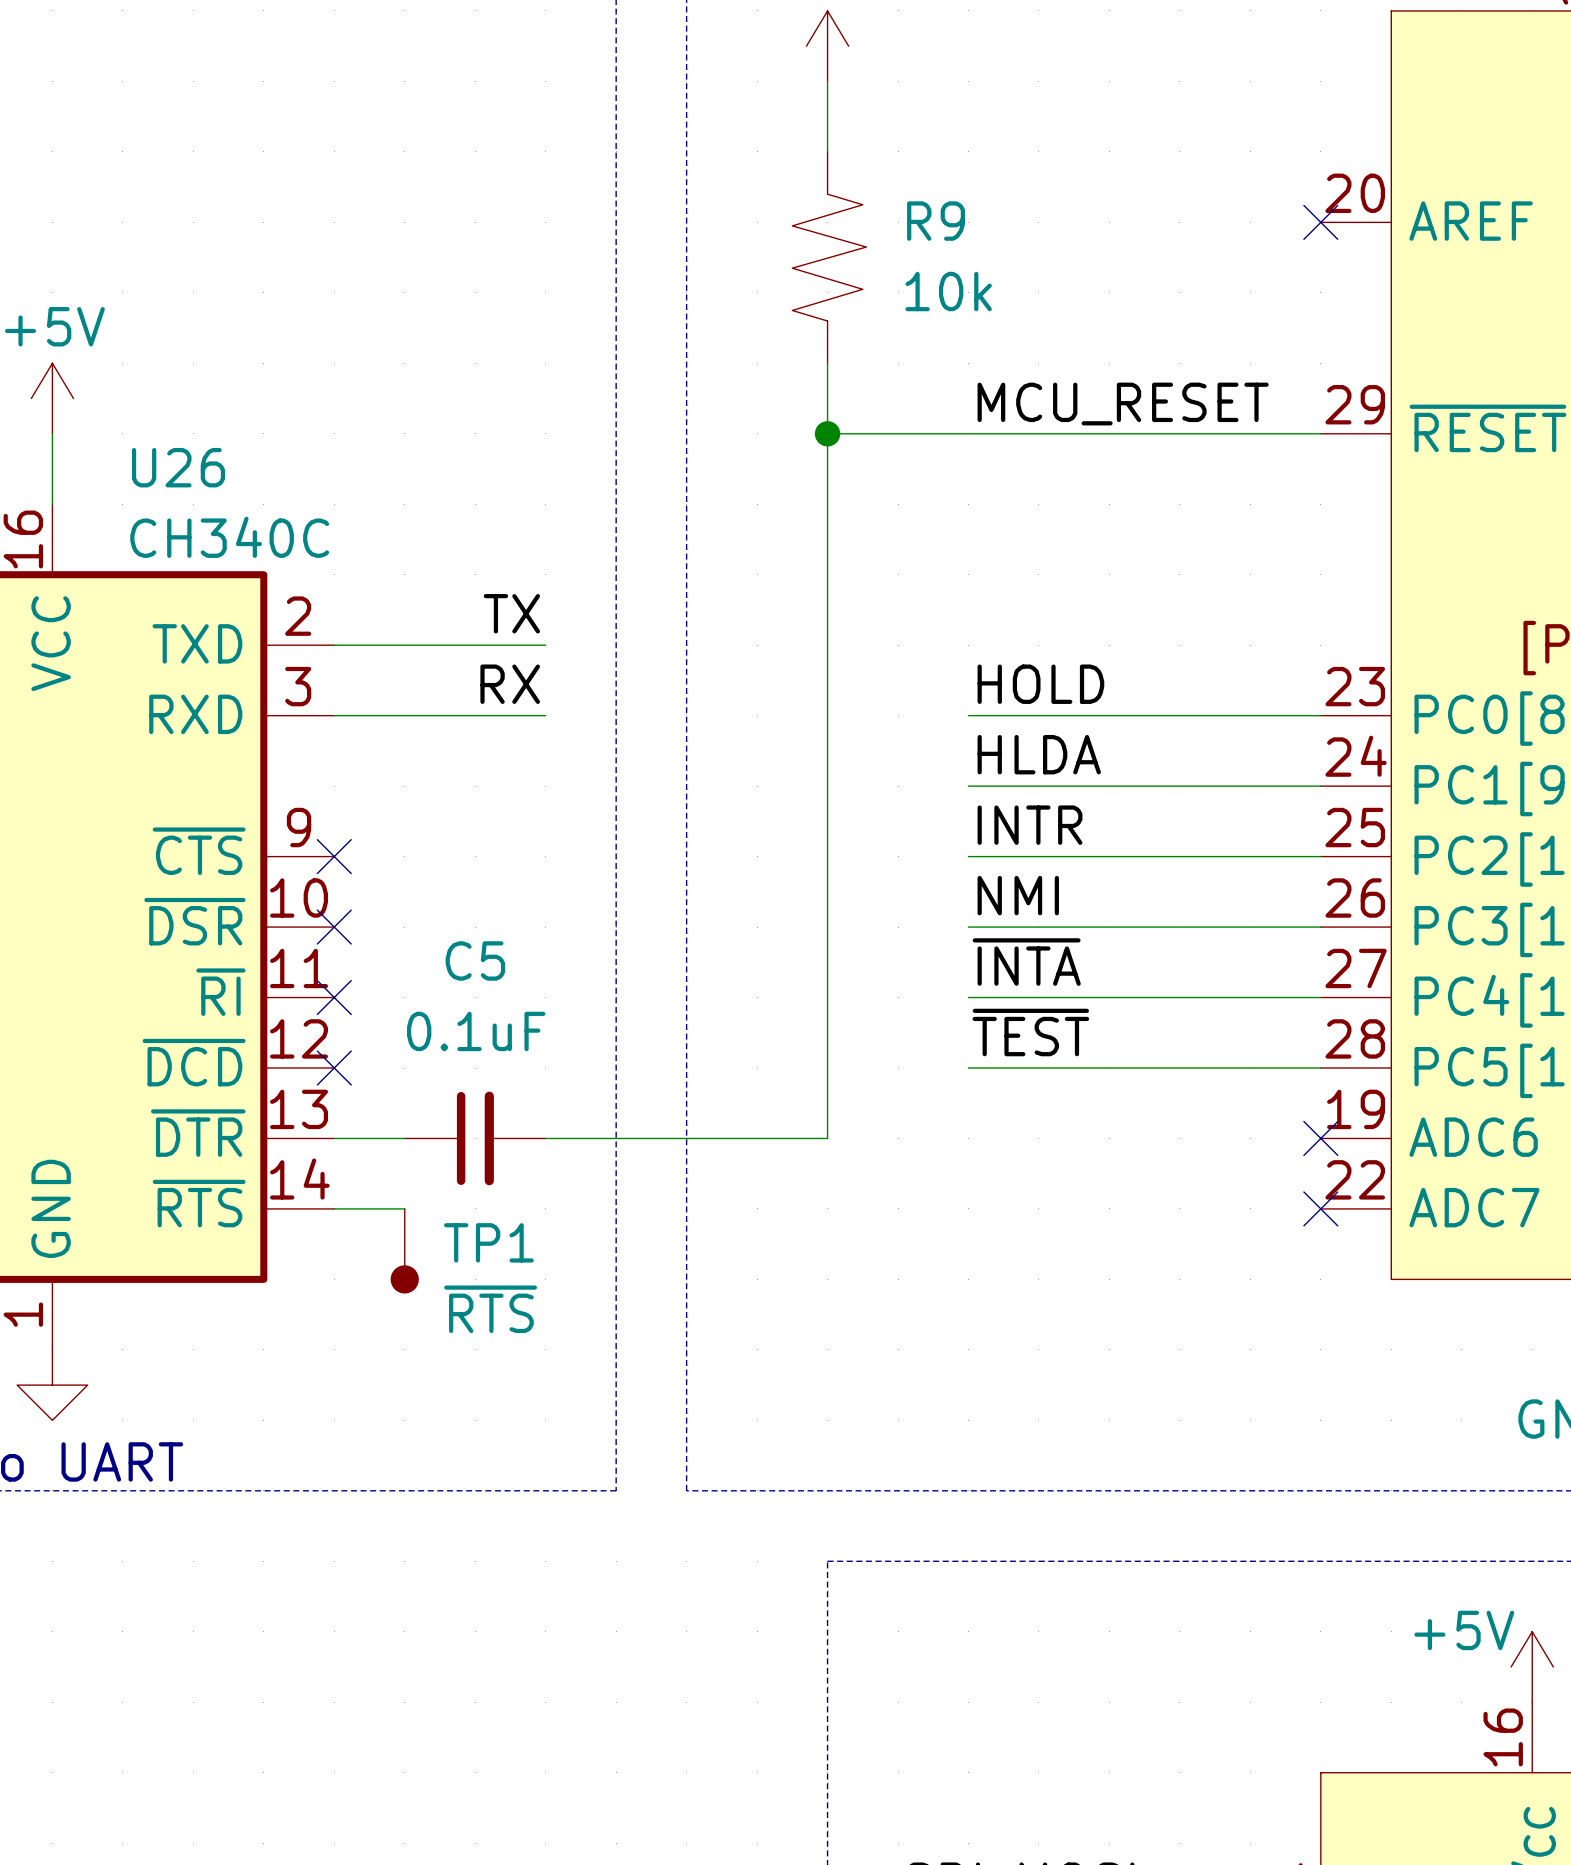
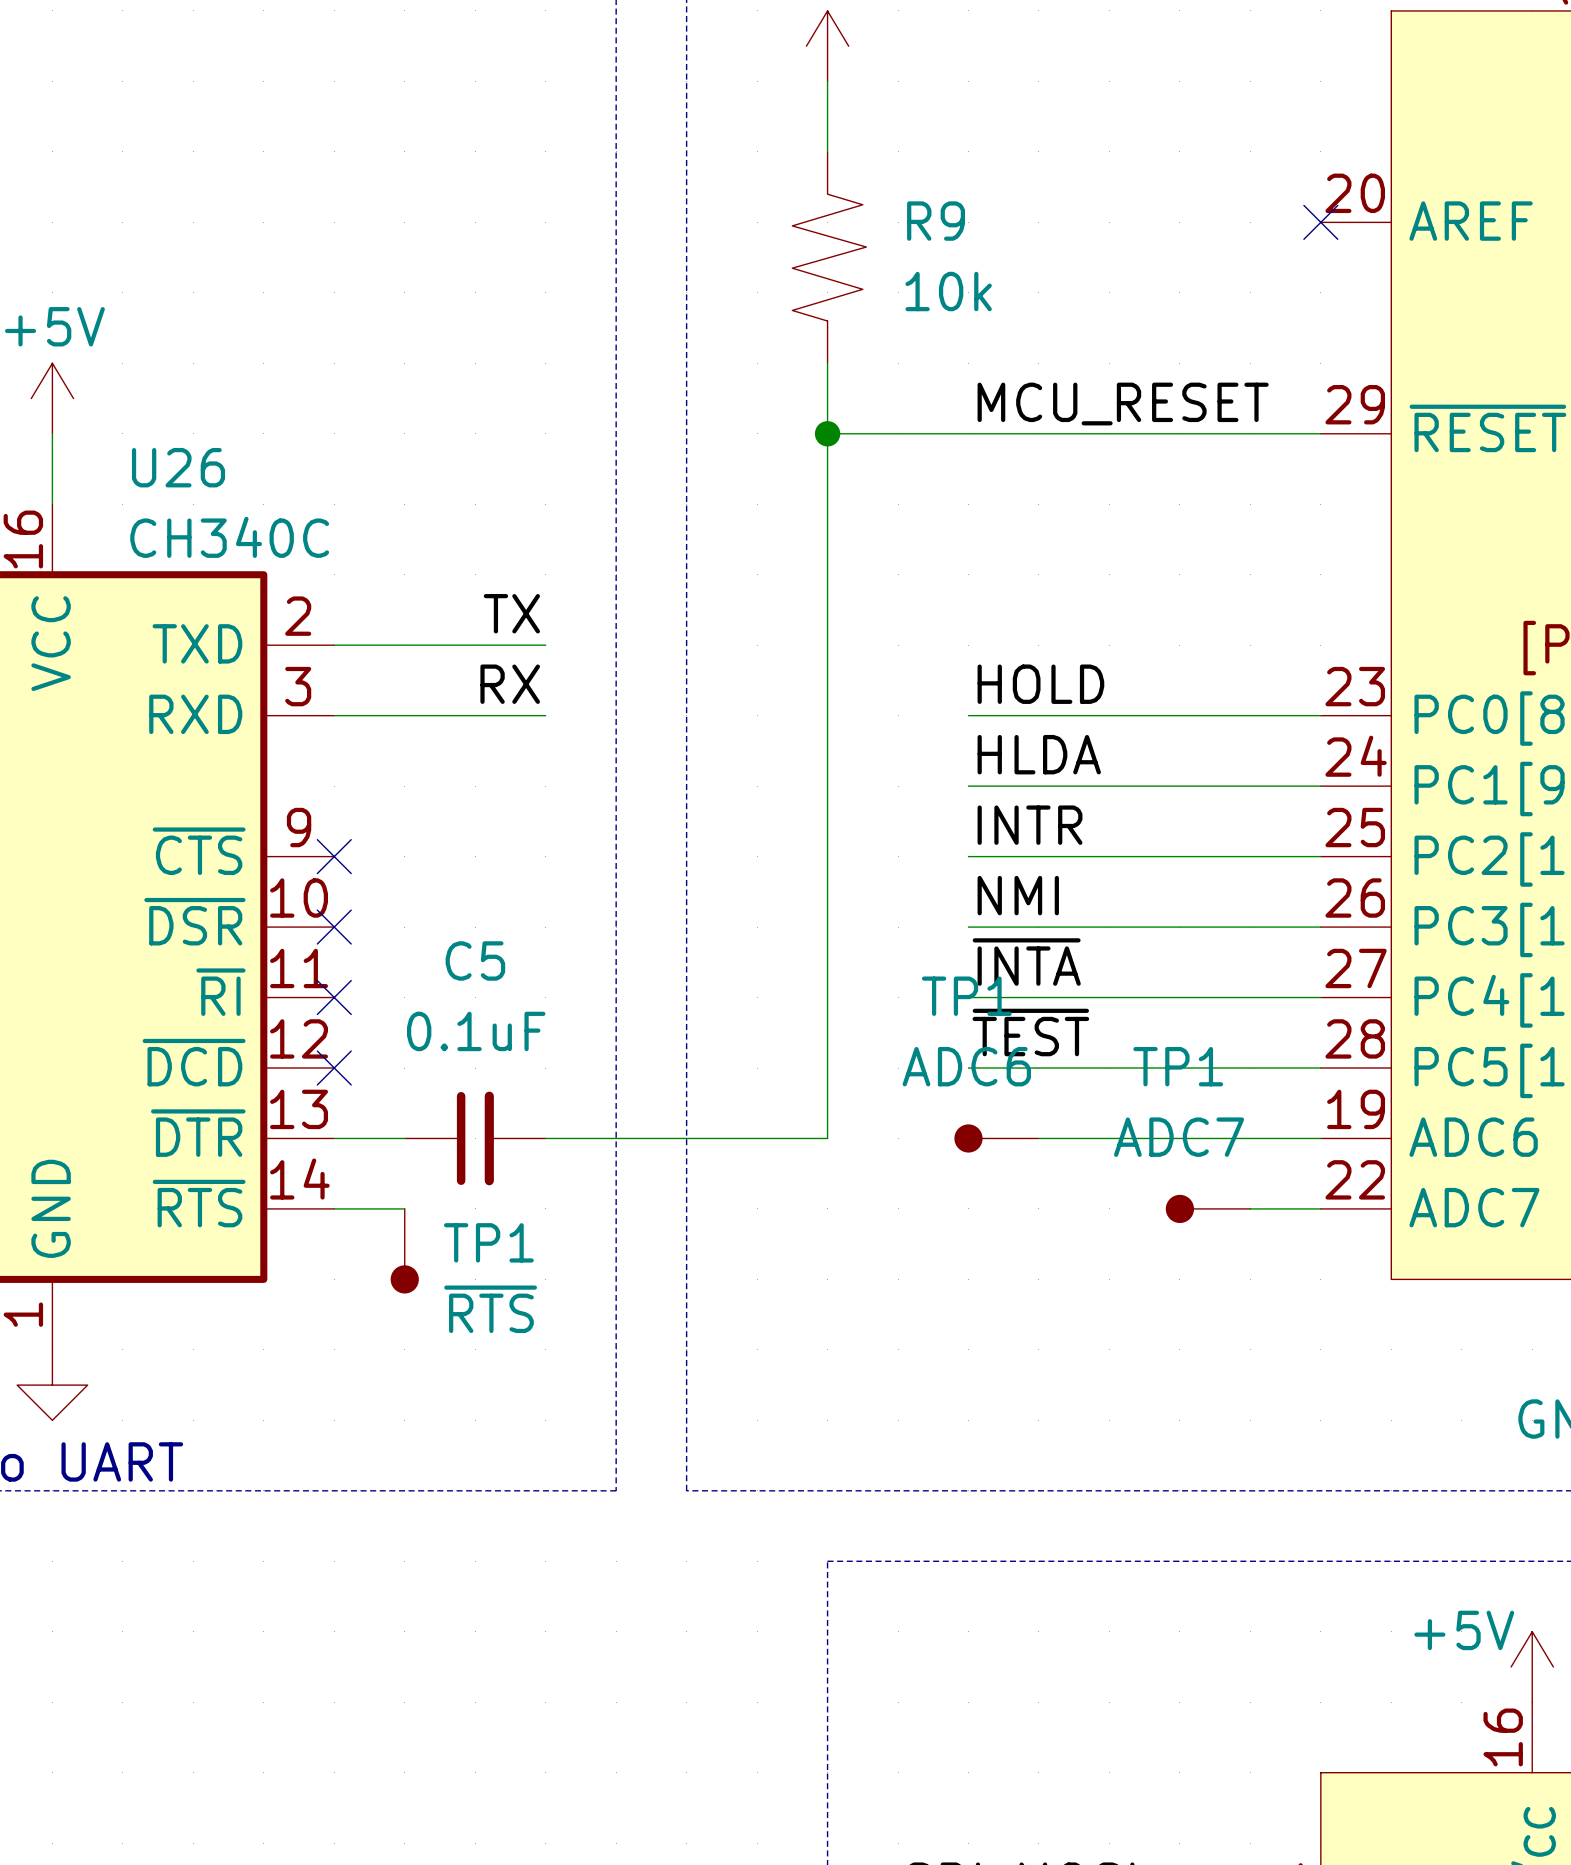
TP1: none -> ADC6 (996, 1138)
wire: none -> (1038, 1138) (1320, 1138)
no-connect mark: (1320, 1138) -> none
TP1: none -> ADC7 (1208, 1208)
wire: none -> (1250, 1208) (1320, 1208)
no-connect mark: (1320, 1208) -> none

